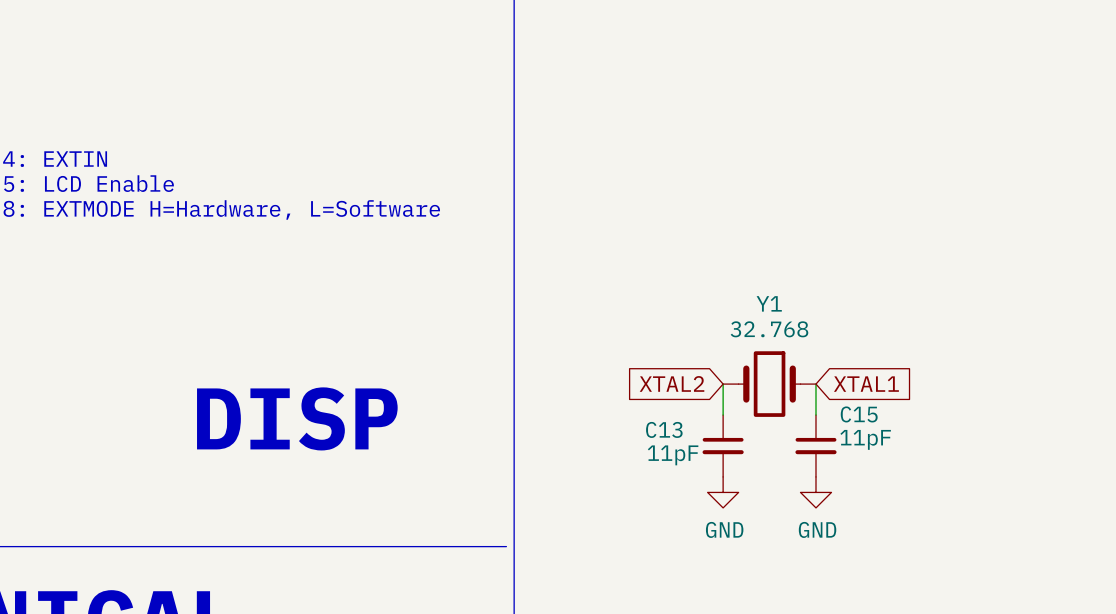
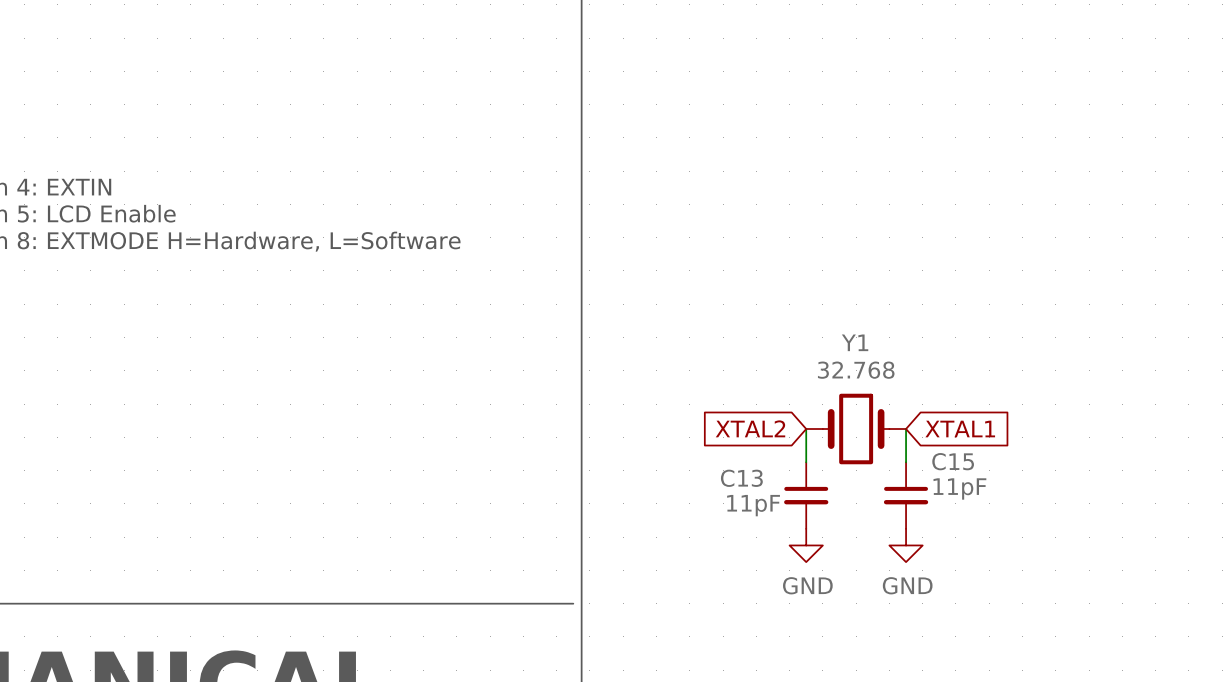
text: DISP (297, 418) -> none

